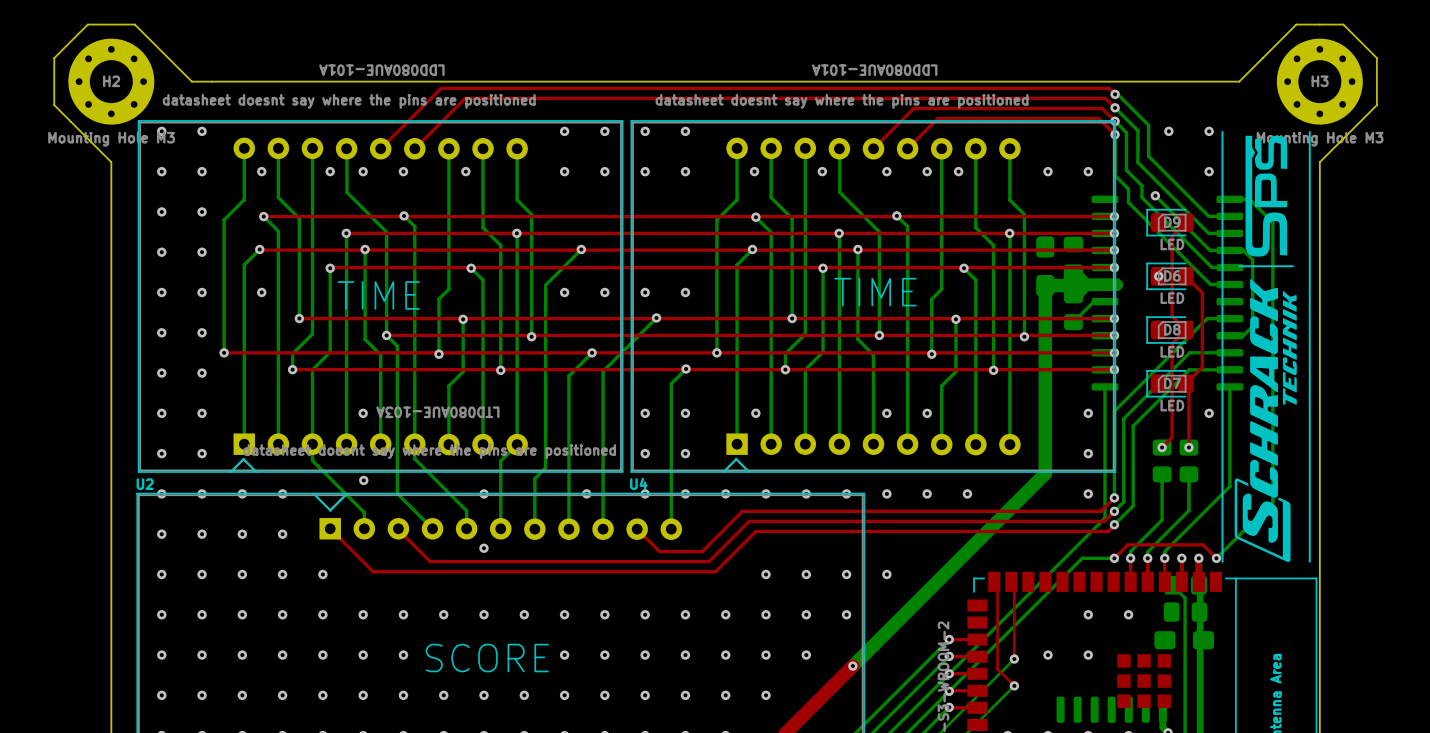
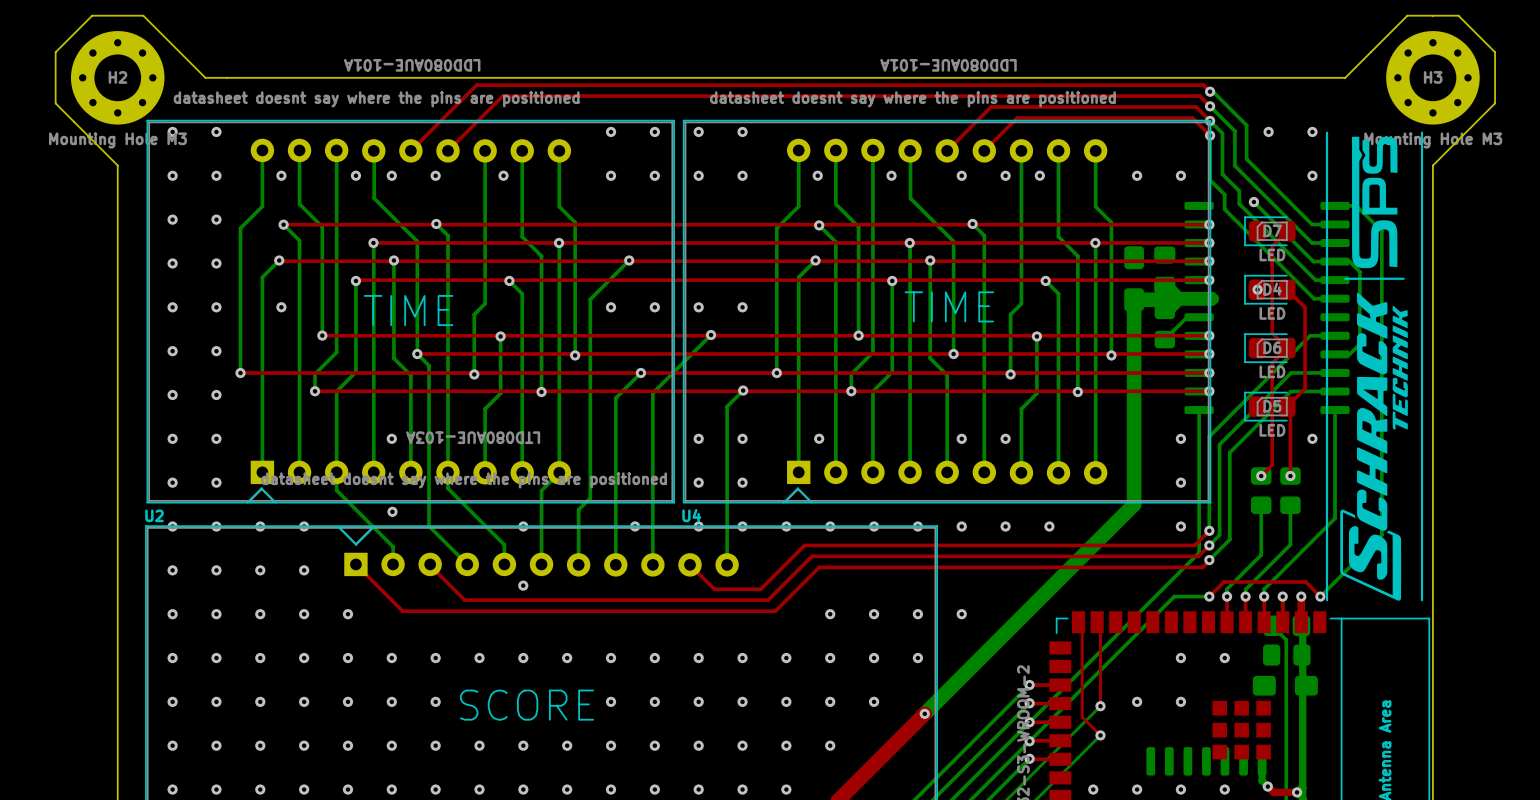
D9 name: D9 (1172, 222) -> D7 (1272, 230)
D6 name: D6 (1172, 275) -> D4 (1272, 289)
D8 name: D8 (1172, 329) -> D6 (1272, 347)
D7 name: D7 (1172, 383) -> D5 (1272, 406)

